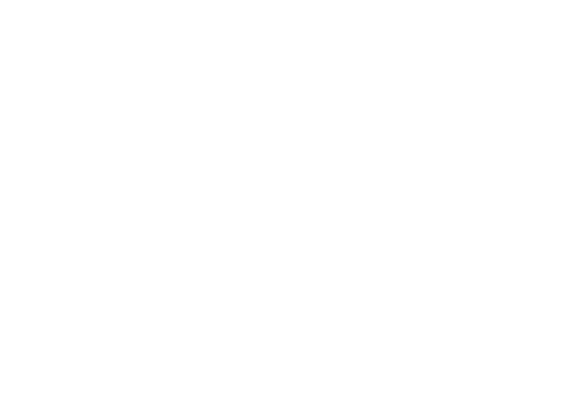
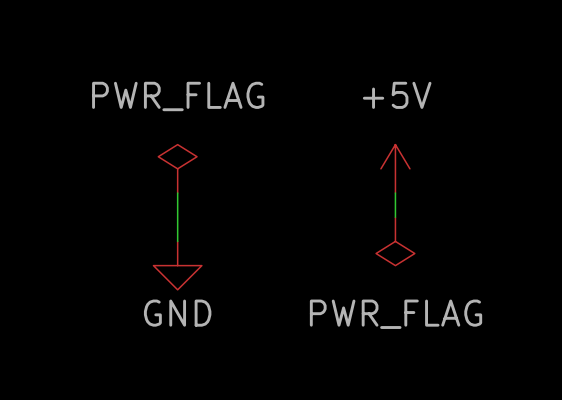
power symbol: none -> PWR_FLAG (177, 168)
power symbol: none -> +5V (395, 168)
wire: none -> (177, 193) (177, 241)
wire: none -> (395, 193) (395, 217)
power symbol: none -> PWR_FLAG (395, 241)
power symbol: none -> GND (177, 265)

